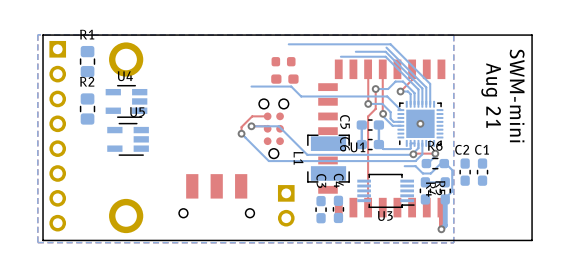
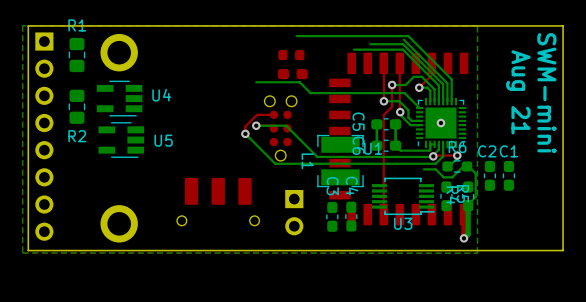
U4 name position: U4 (125, 76) -> U4 (161, 95)
R2 name position: R2 (87, 81) -> R2 (77, 136)
U5 name position: U5 (137, 112) -> U5 (163, 140)

